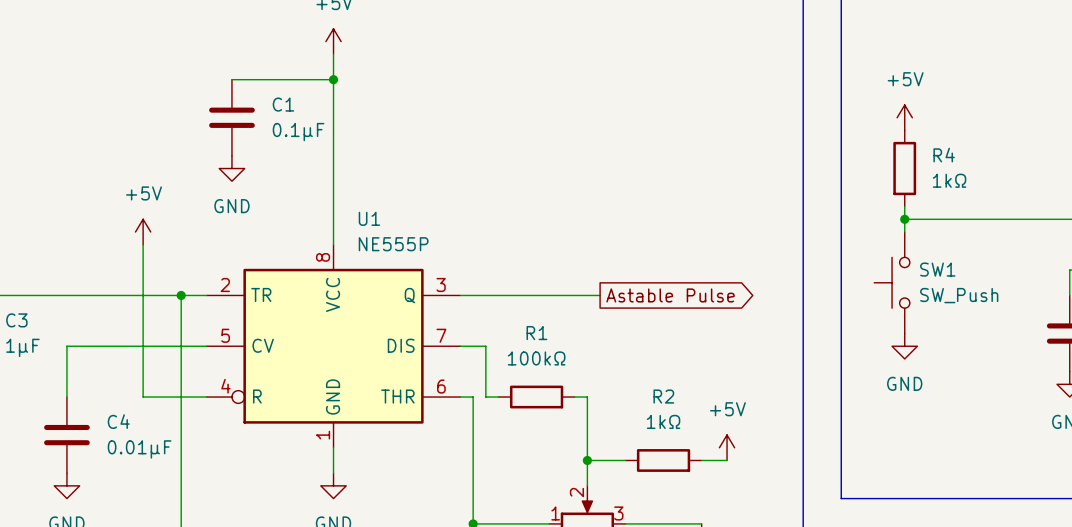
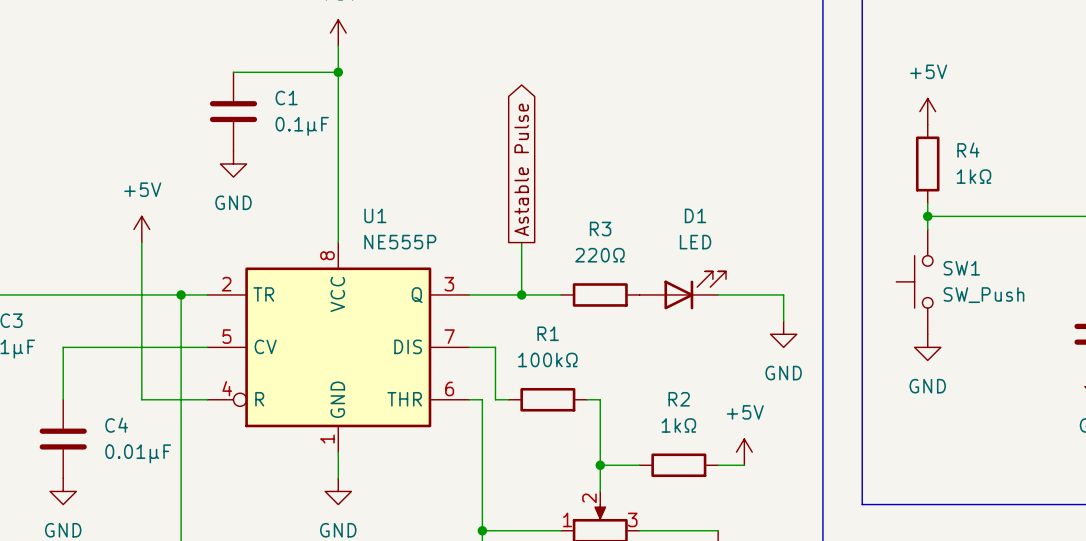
wire: none -> (521, 242) (521, 294)
D1: none -> LED (682, 290)
junction: none -> (521, 294)
wire: (549, 295) (600, 295) -> none
R3: none -> 220Ω (600, 294)
global label rotation: 0° (670, 295) -> 90° counterclockwise (521, 169)
global label position: Astable Pulse (670, 295) -> Astable Pulse (521, 169)
wire: none -> (718, 294) (783, 294) (783, 321)
power symbol: none -> GND (783, 334)

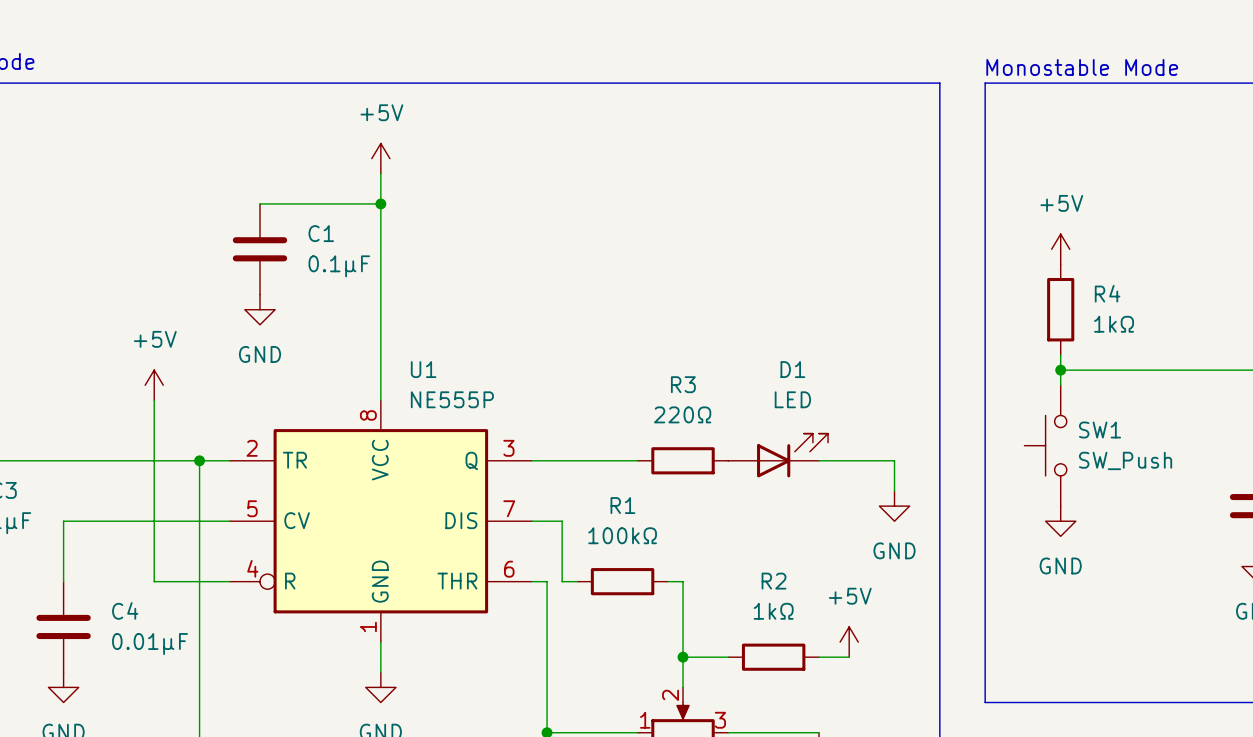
global label: Astable Pulse (521, 169) -> none
wire: (521, 242) (521, 294) -> none
junction: (521, 294) -> none

